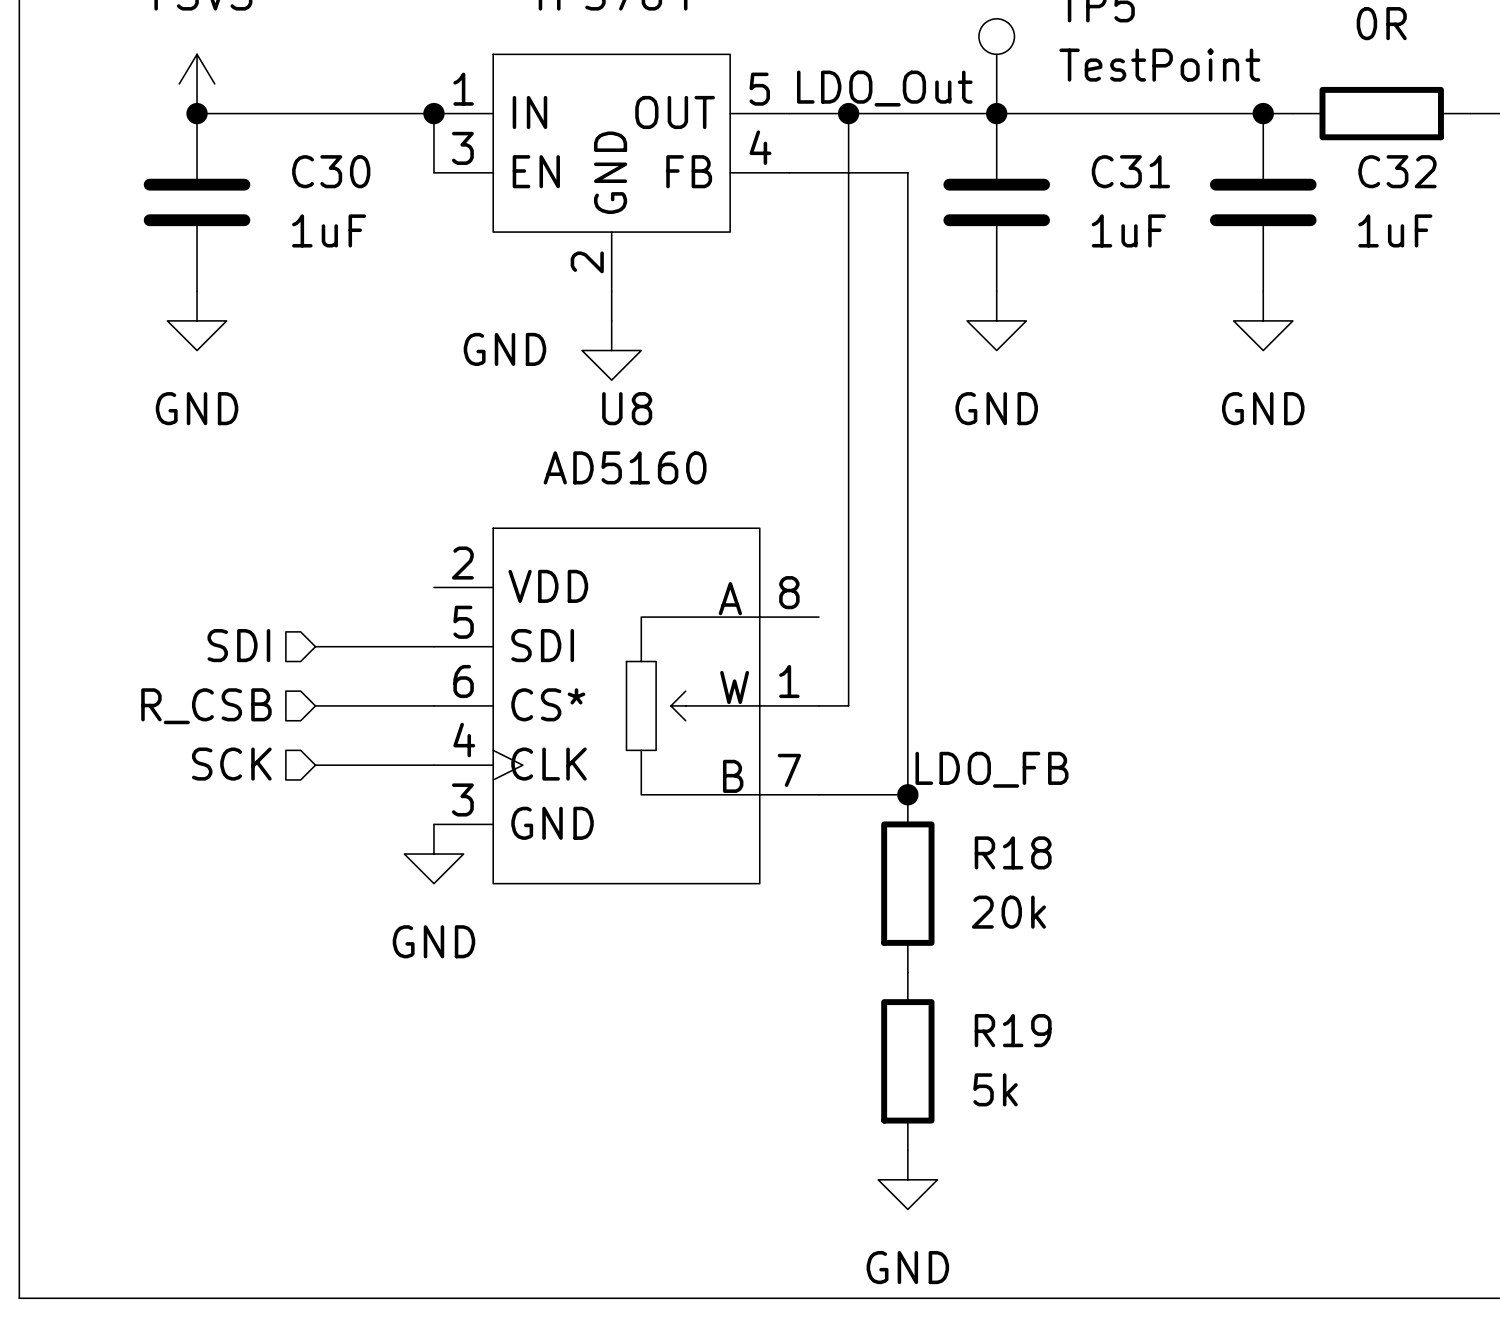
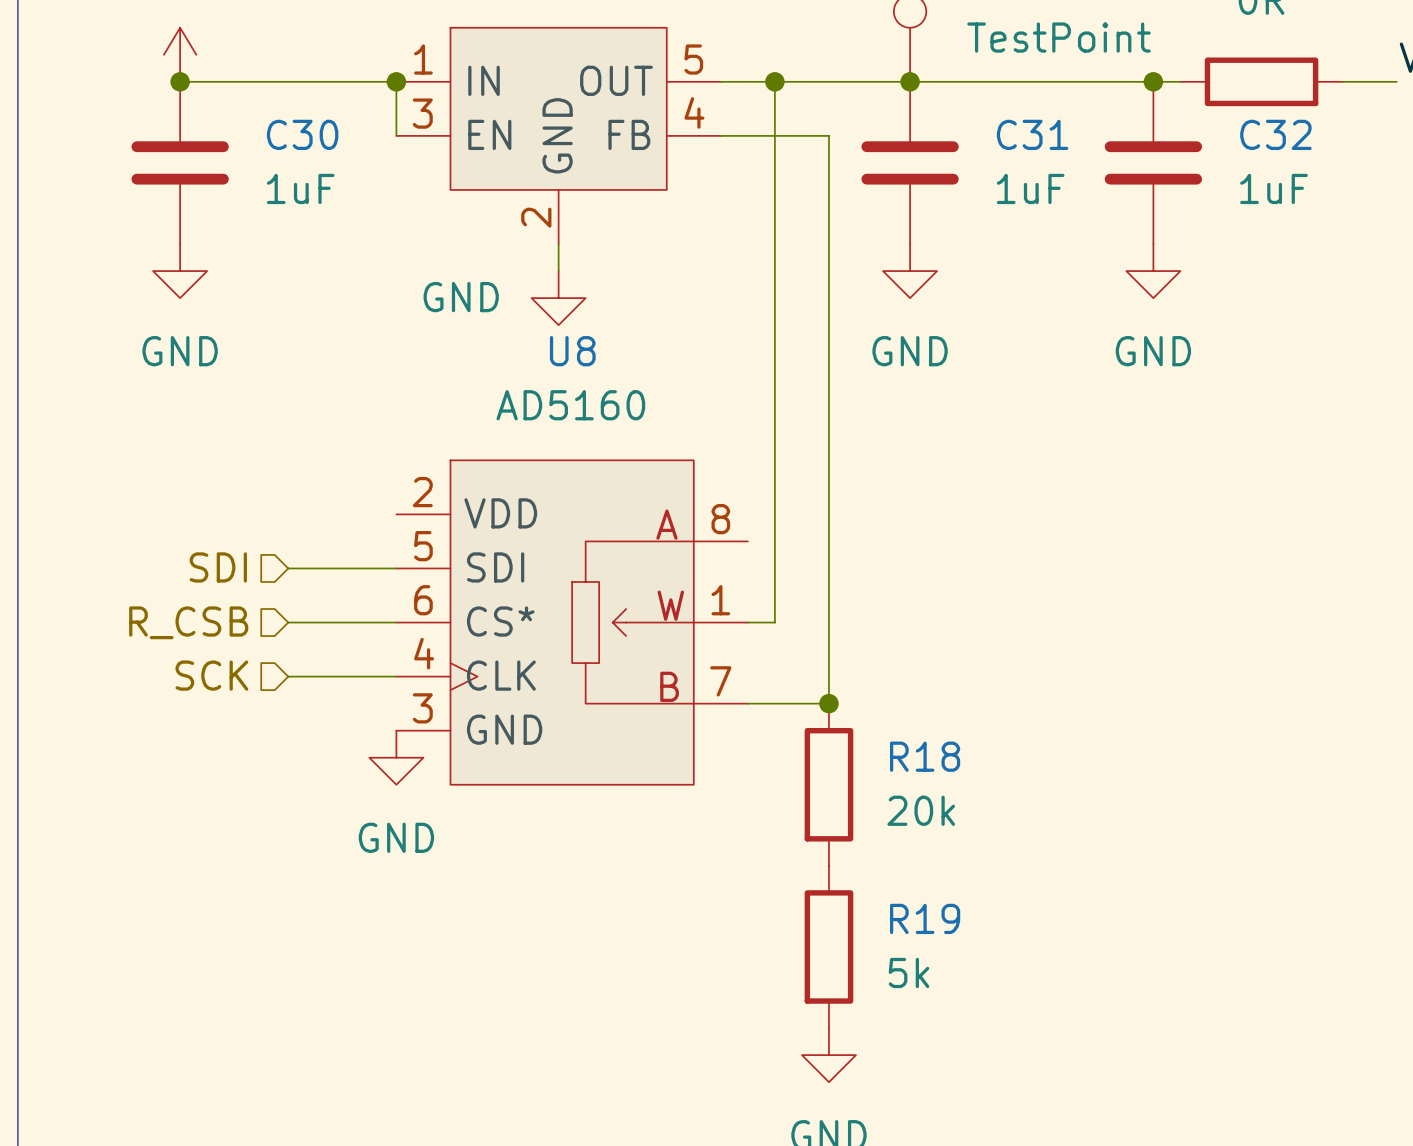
label: LDO_Out (884, 88) -> none
label: LDO_FB (991, 769) -> none

